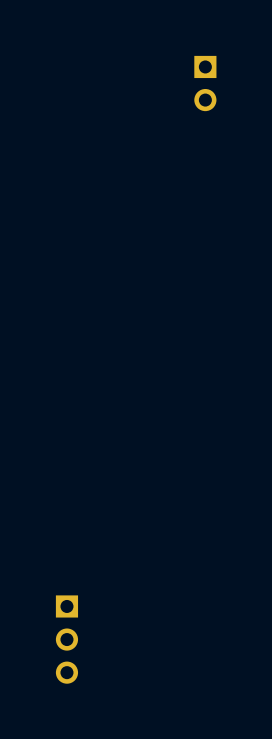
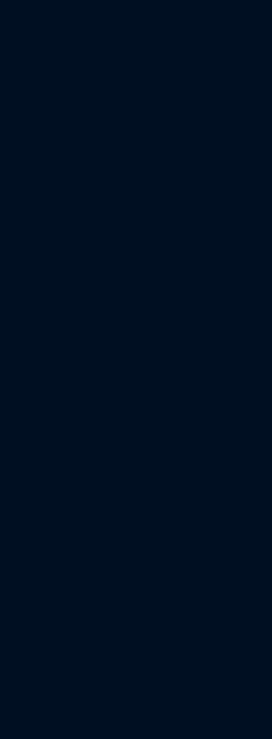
part: (205, 83) -> none
part: (66, 639) -> none

